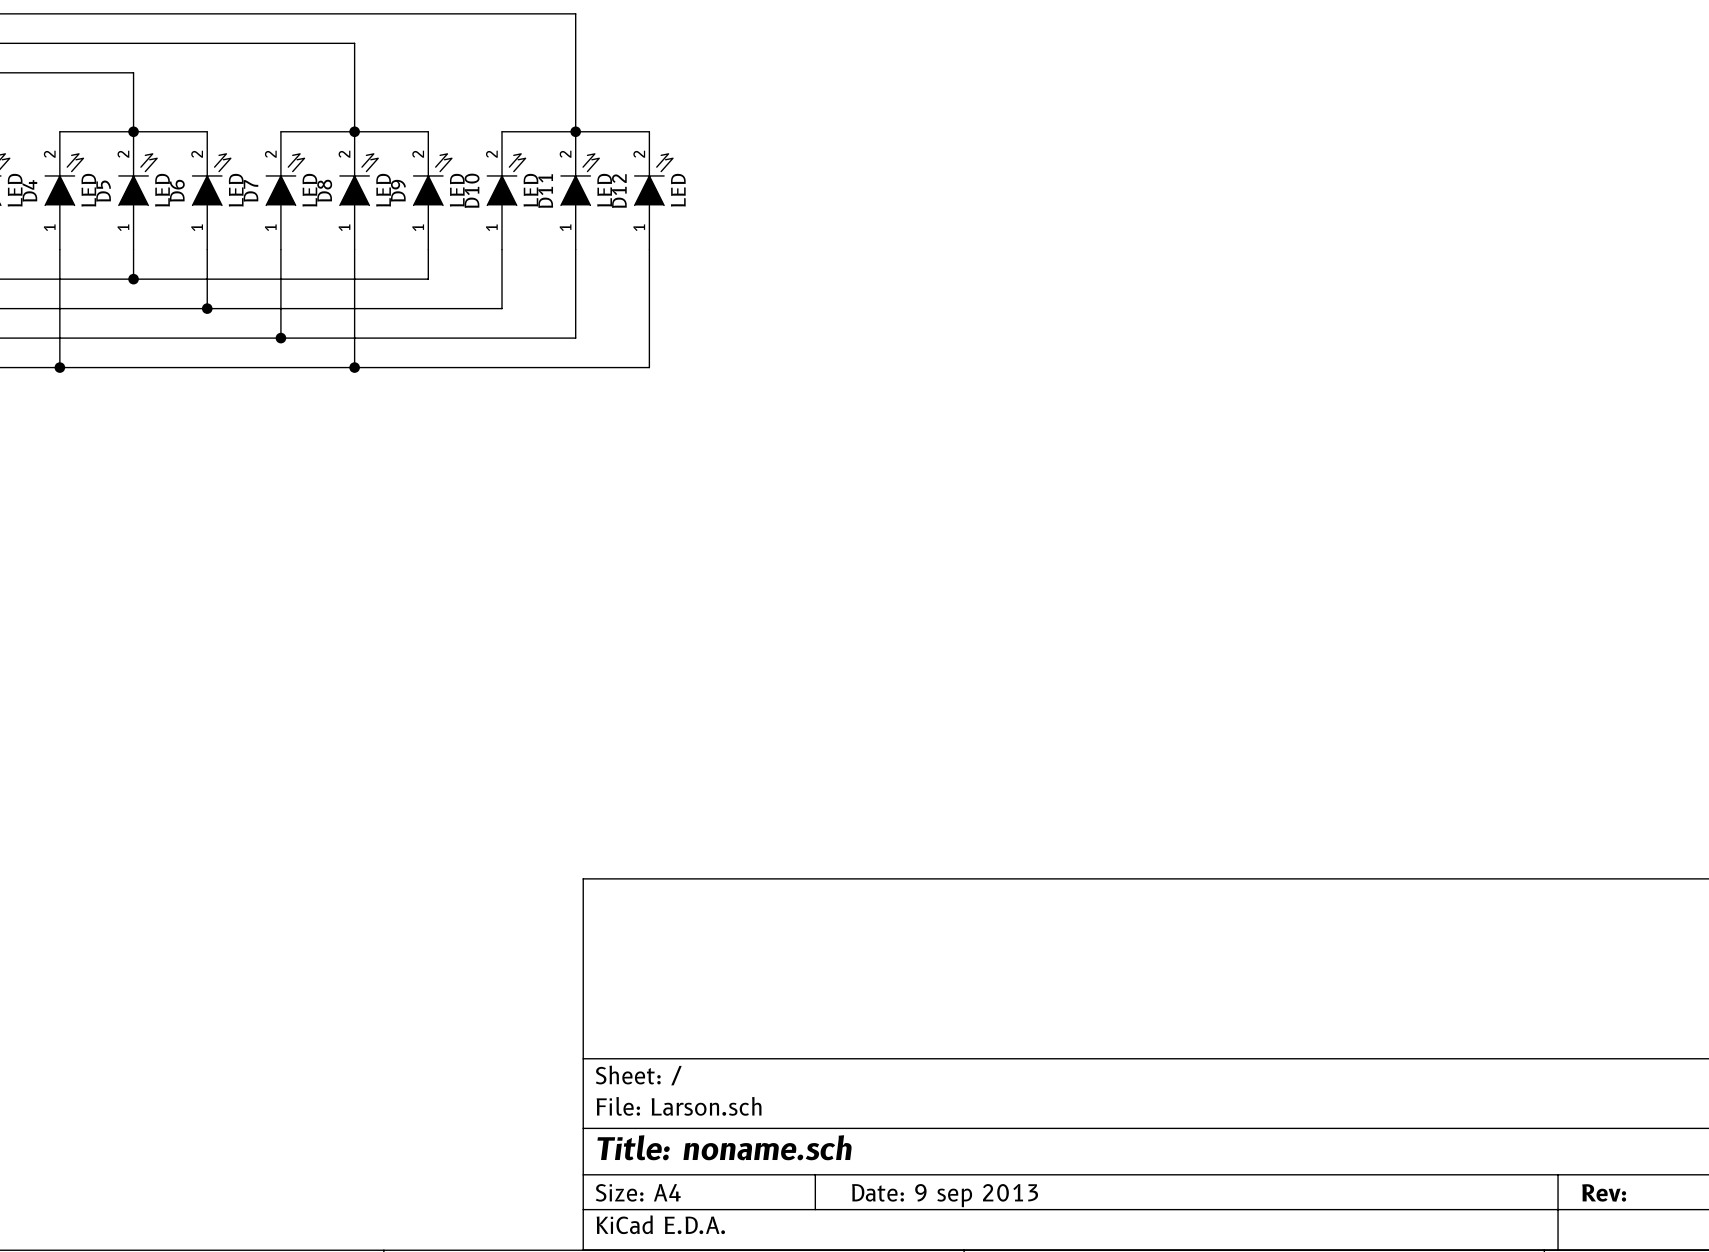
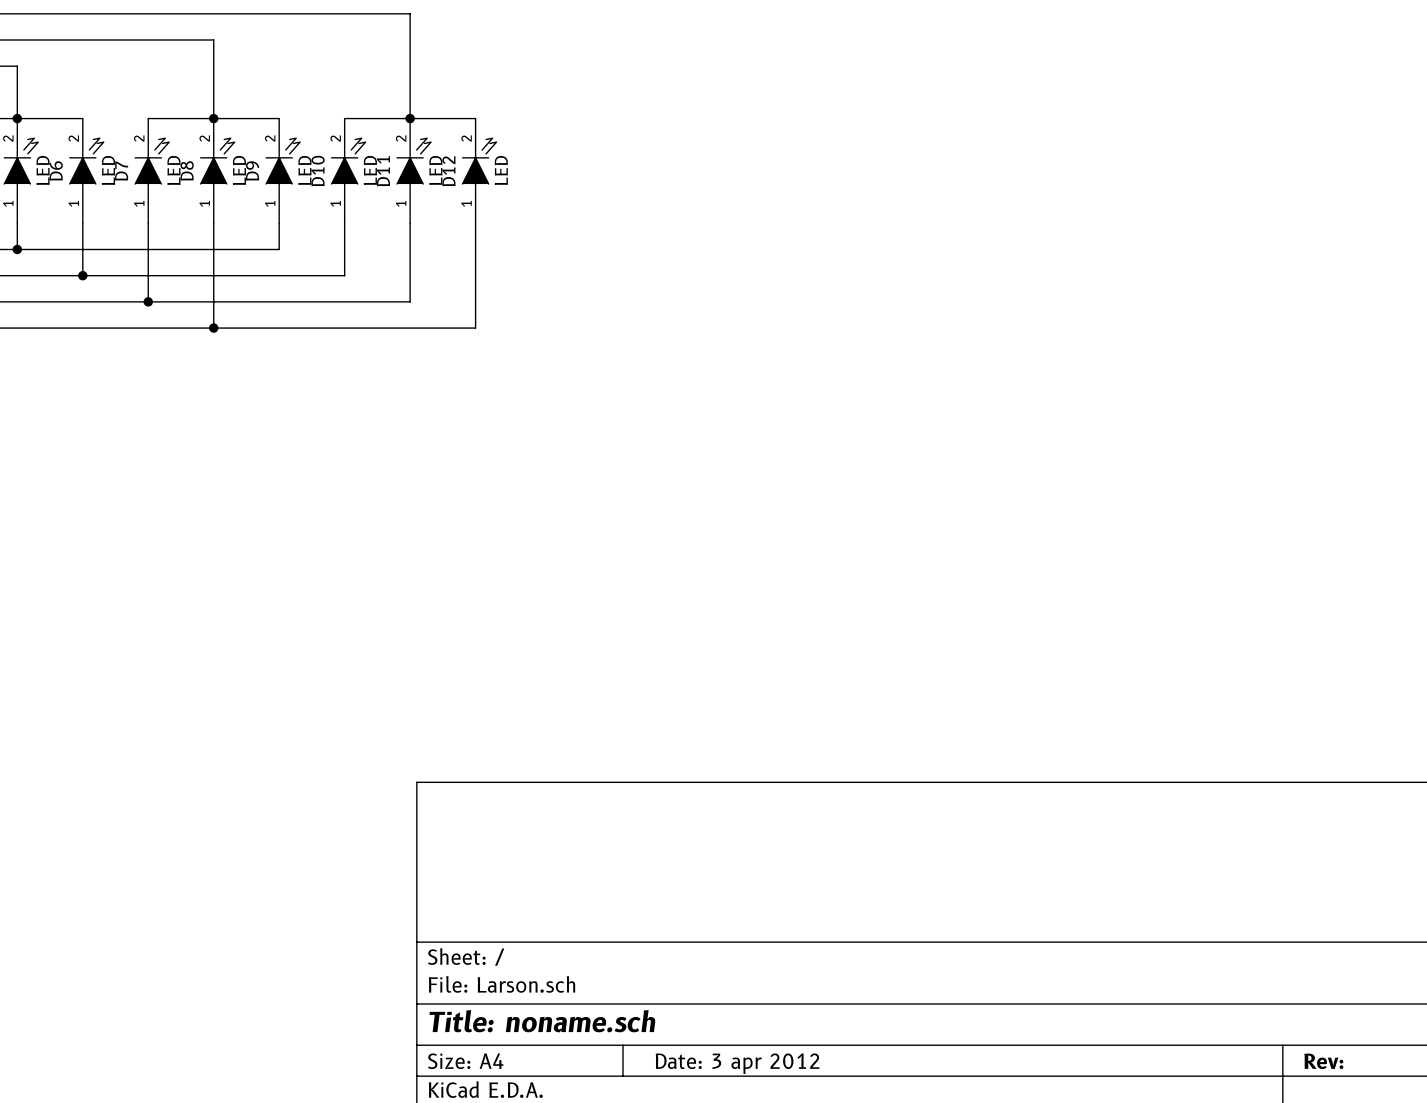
title block: Date: 9 sep 2013 (945, 1195) -> Date: 3 apr 2012 (737, 1063)

